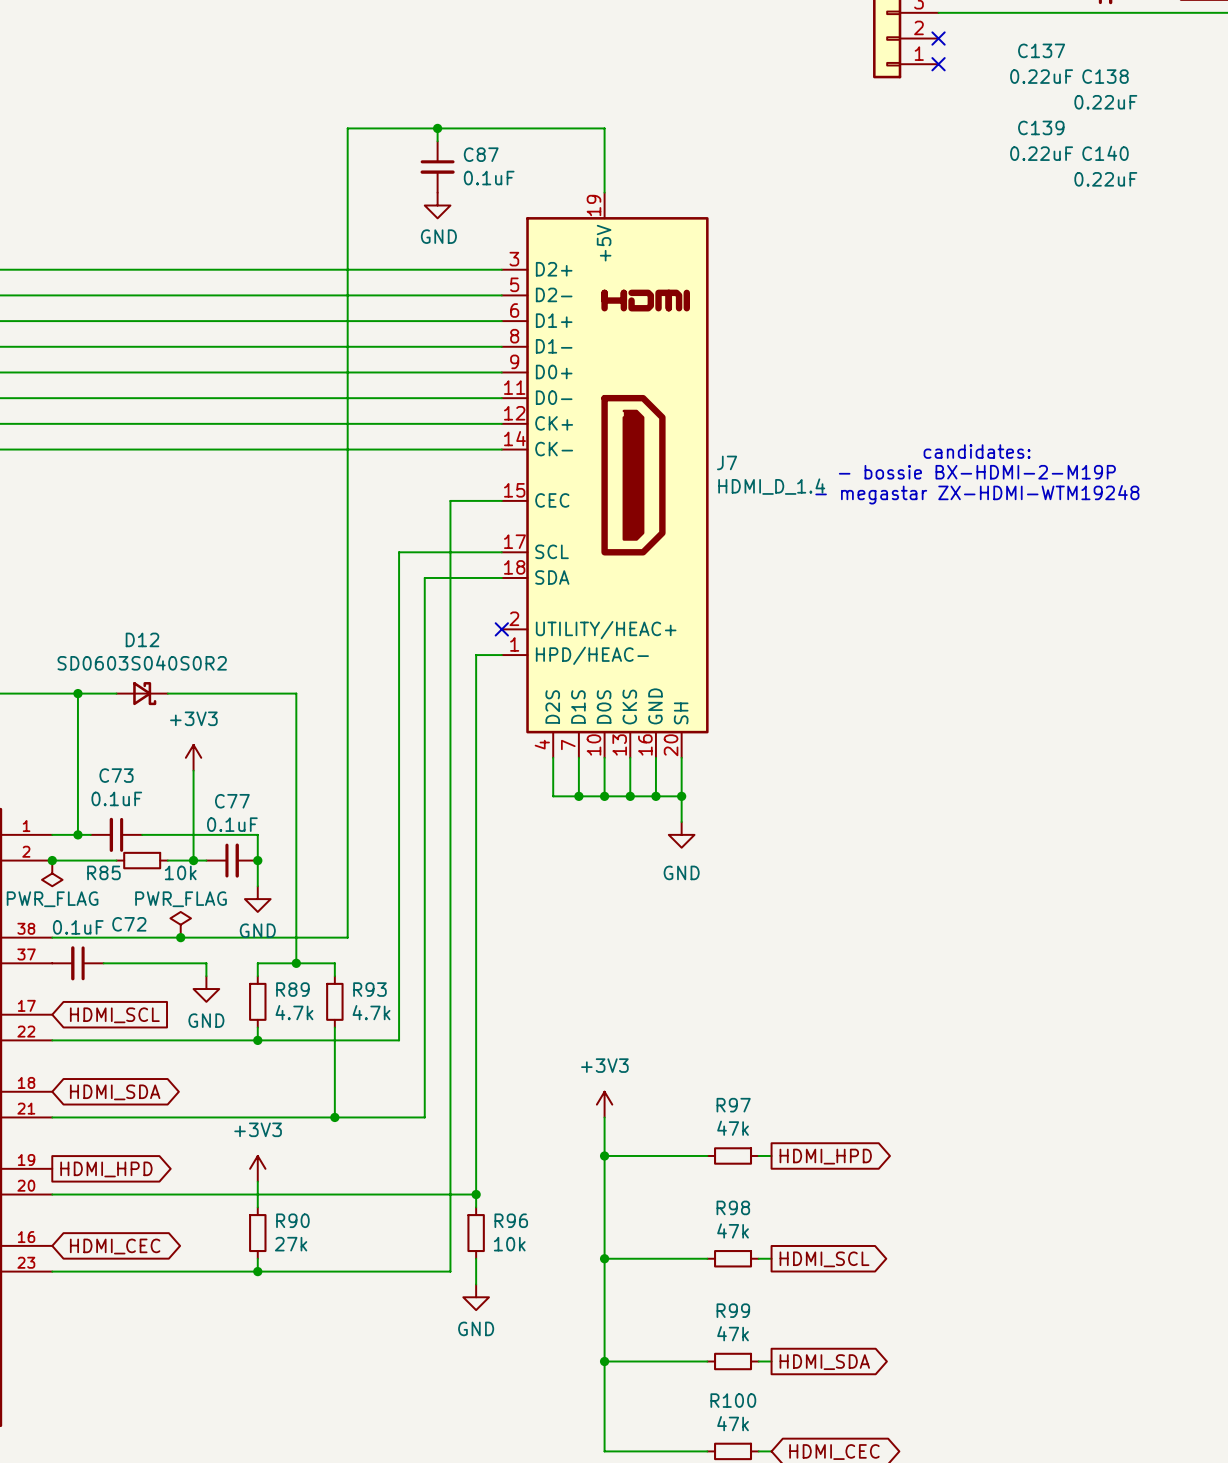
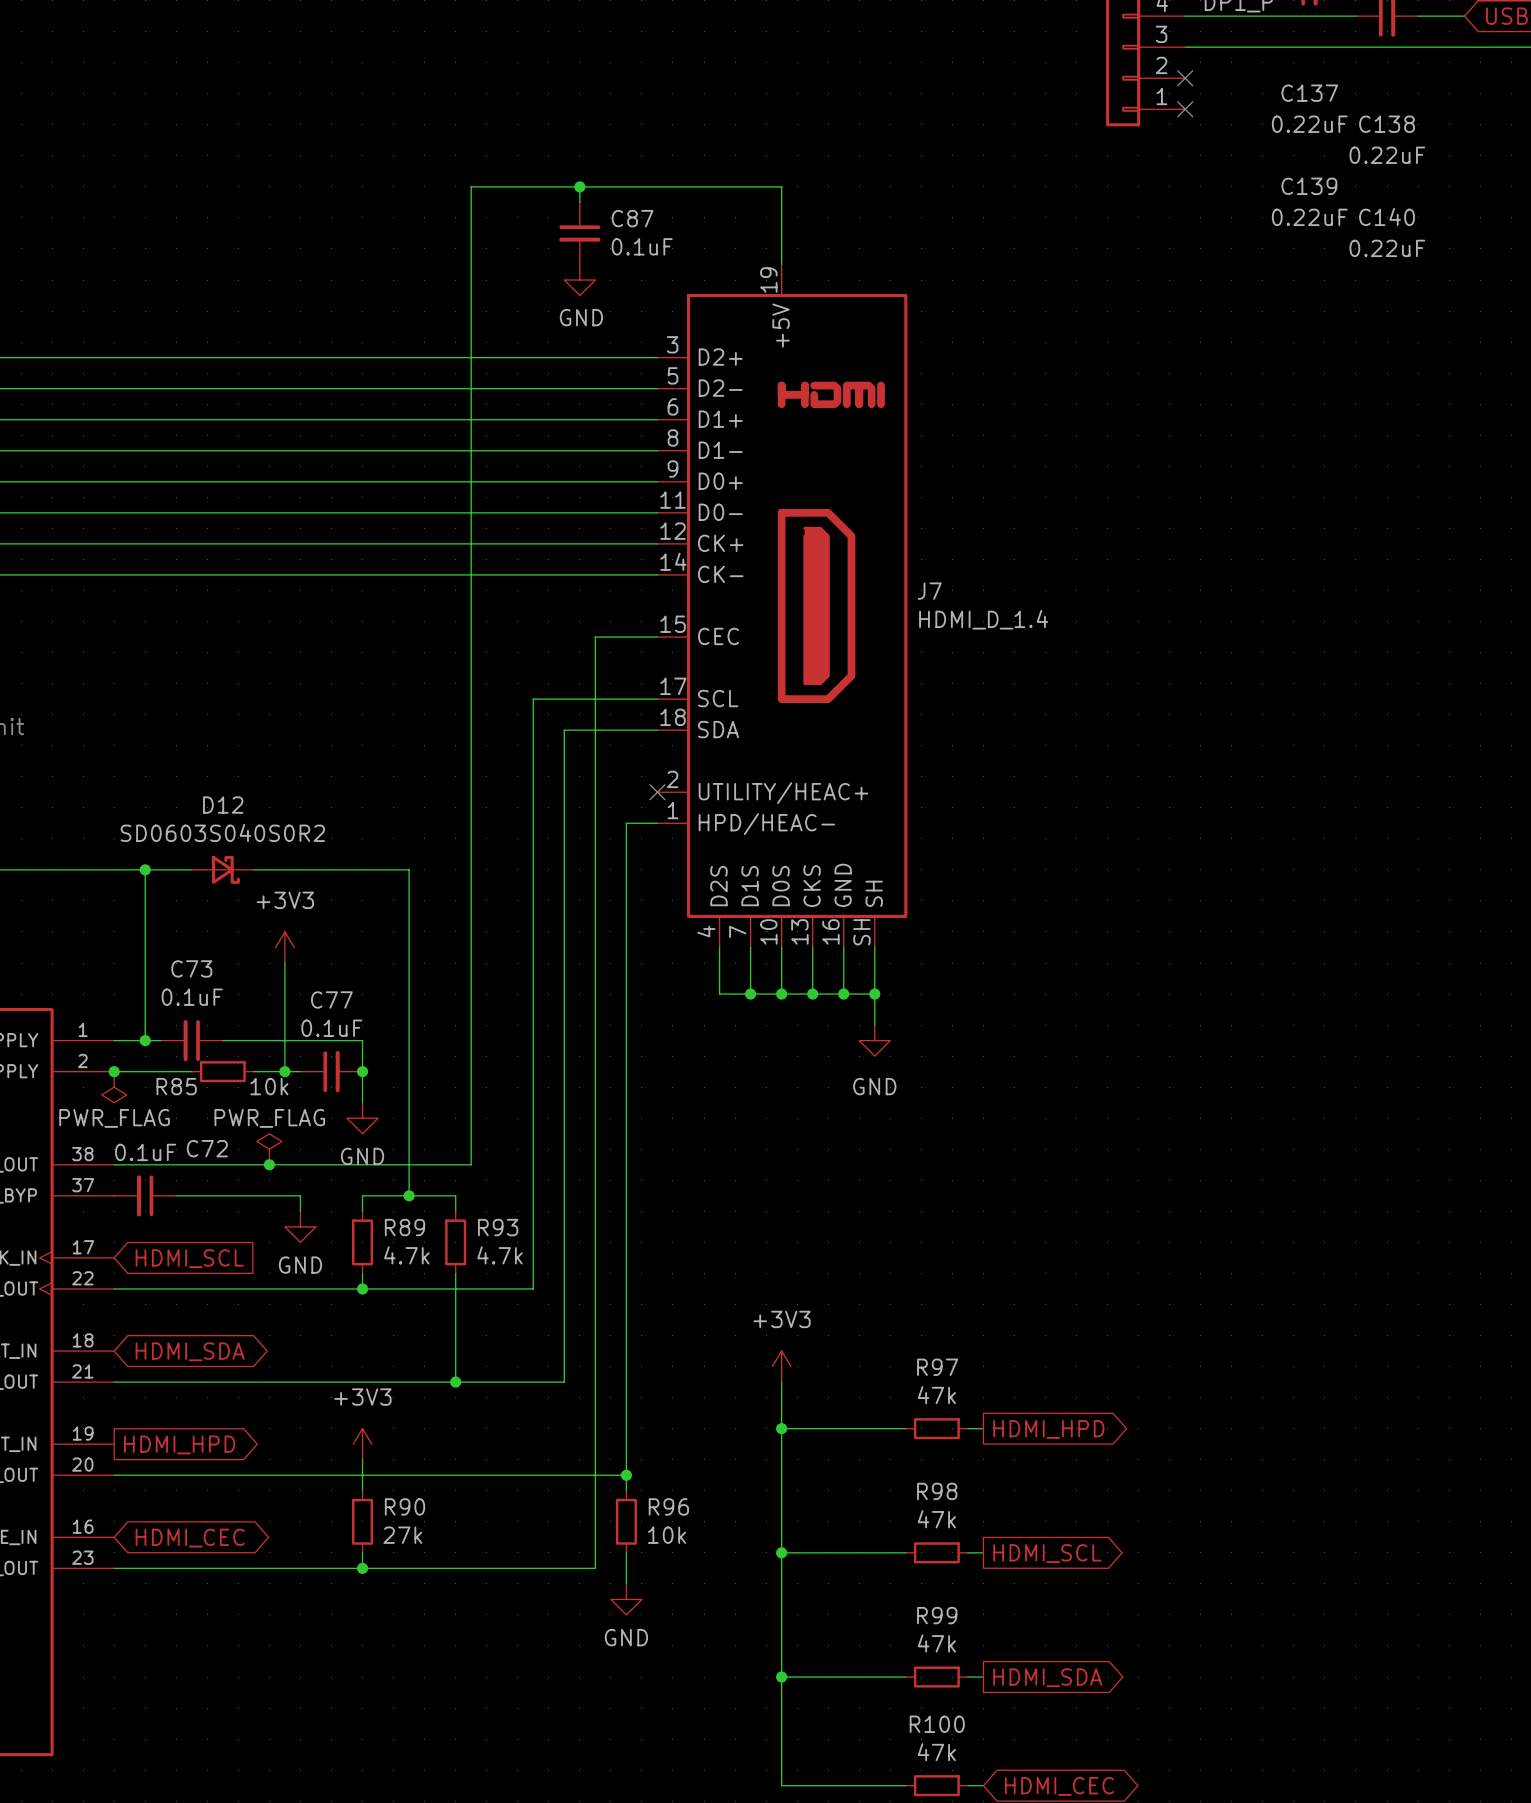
text: candidates: (977, 451) -> none
text: - bossie BX-HDMI-2-M19P (977, 472) -> none
text: - megastar ZX-HDMI-WTM19248 (977, 494) -> none
J7 pin number: 20 (671, 745) -> SH (861, 932)

